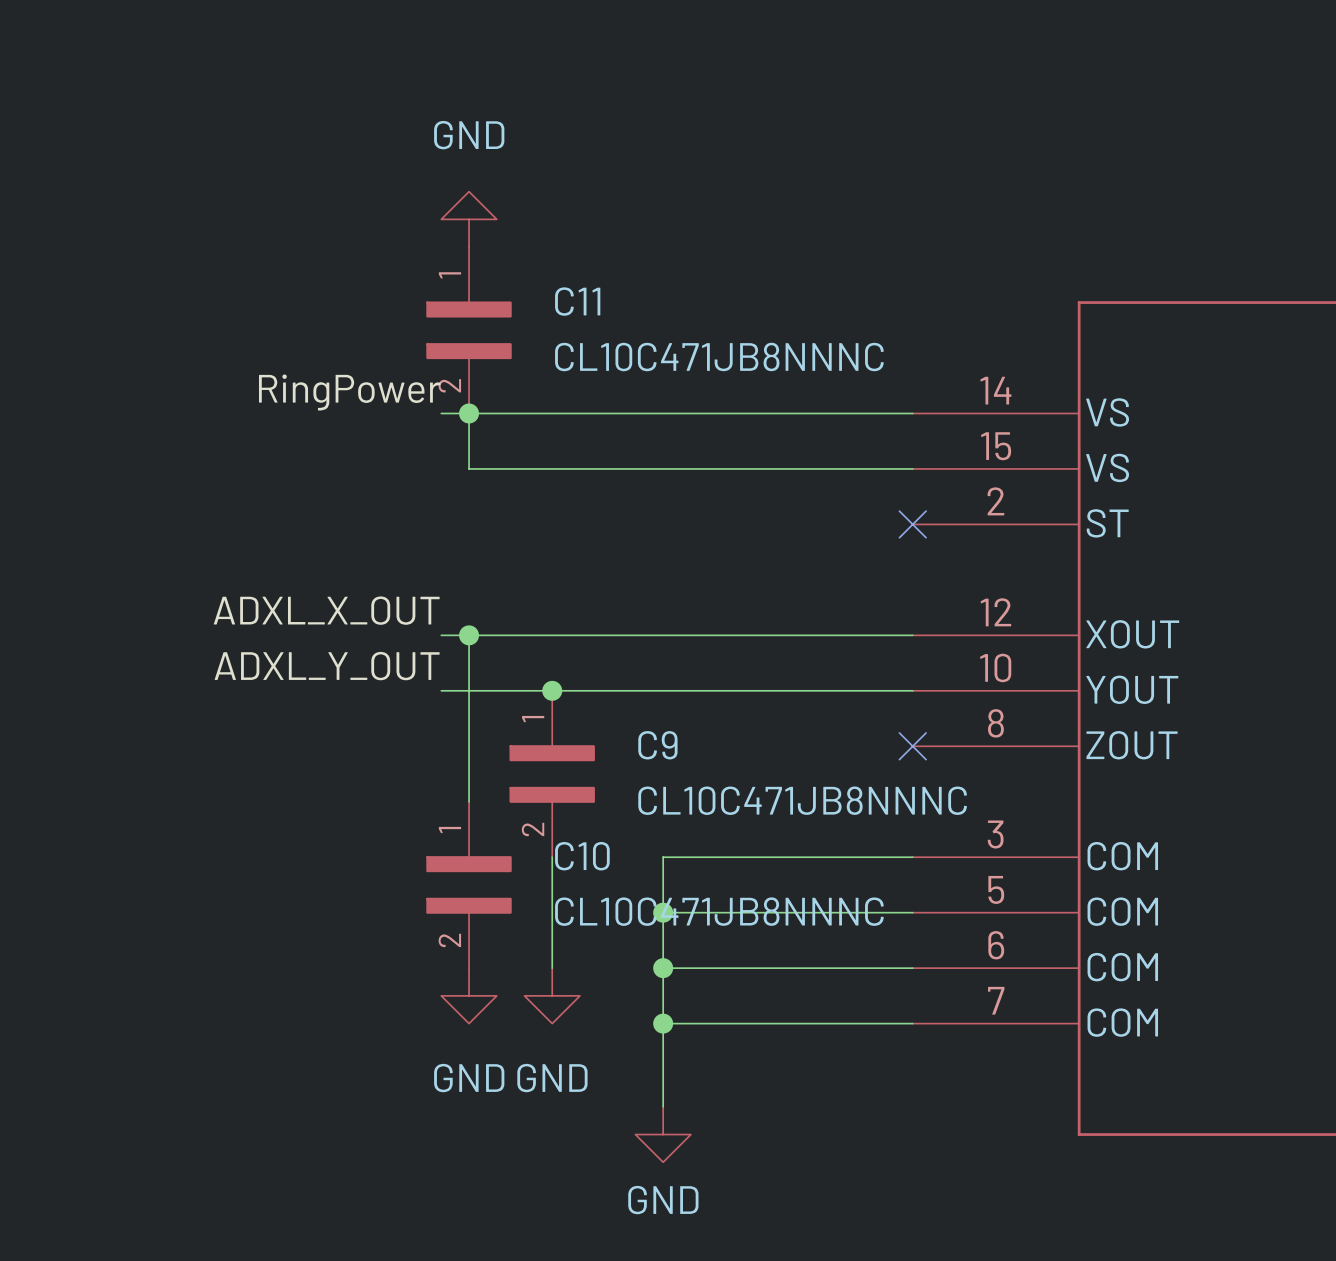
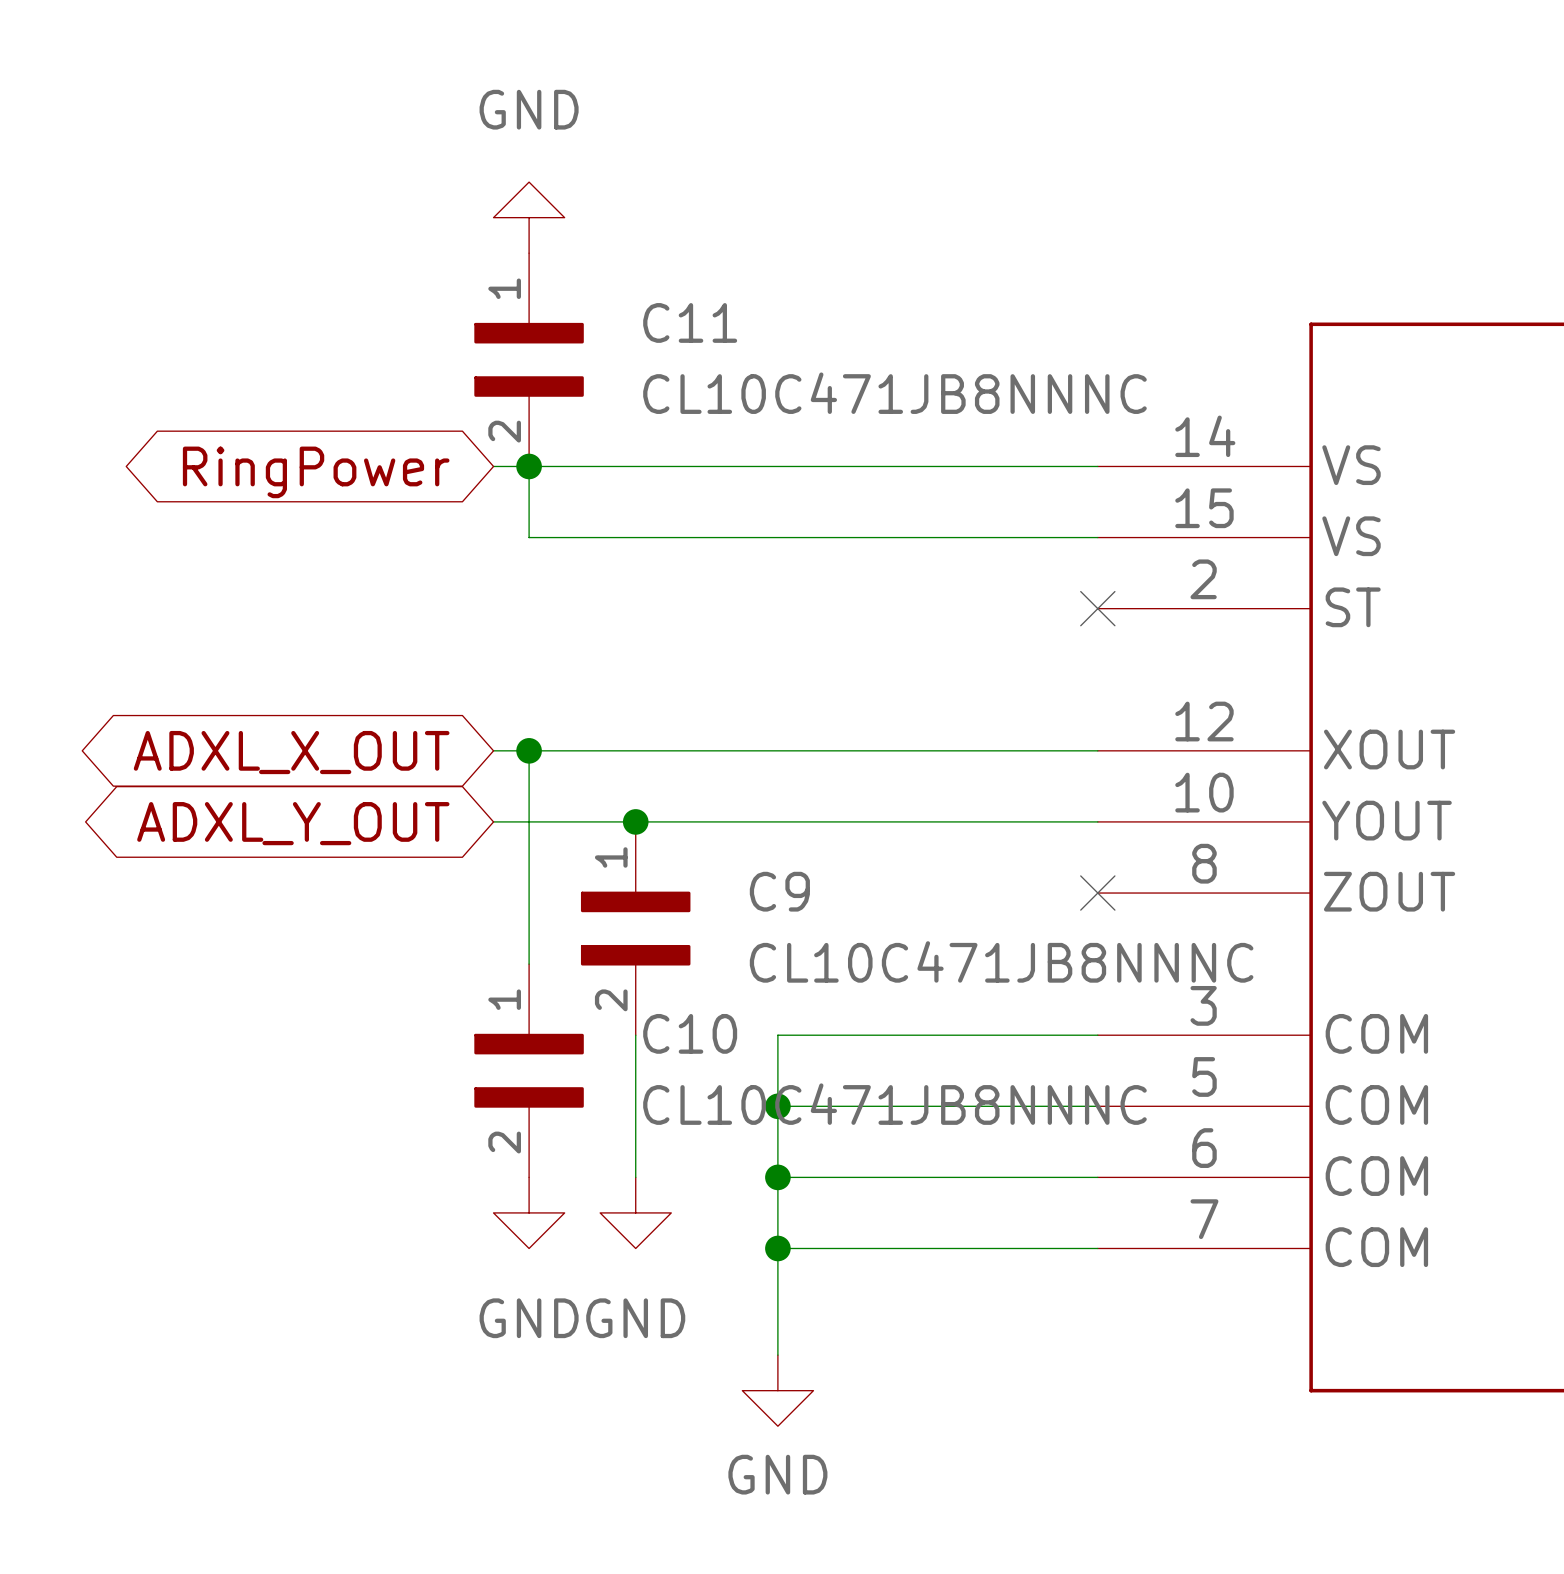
label: RingPower (349, 392) -> none
global label: none -> RingPower (316, 472)
label: ADXL_X_OUT (326, 610) -> none
global label: none -> ADXL_X_OUT (291, 752)
label: ADXL_Y_OUT (327, 666) -> none
global label: none -> ADXL_Y_OUT (293, 823)

